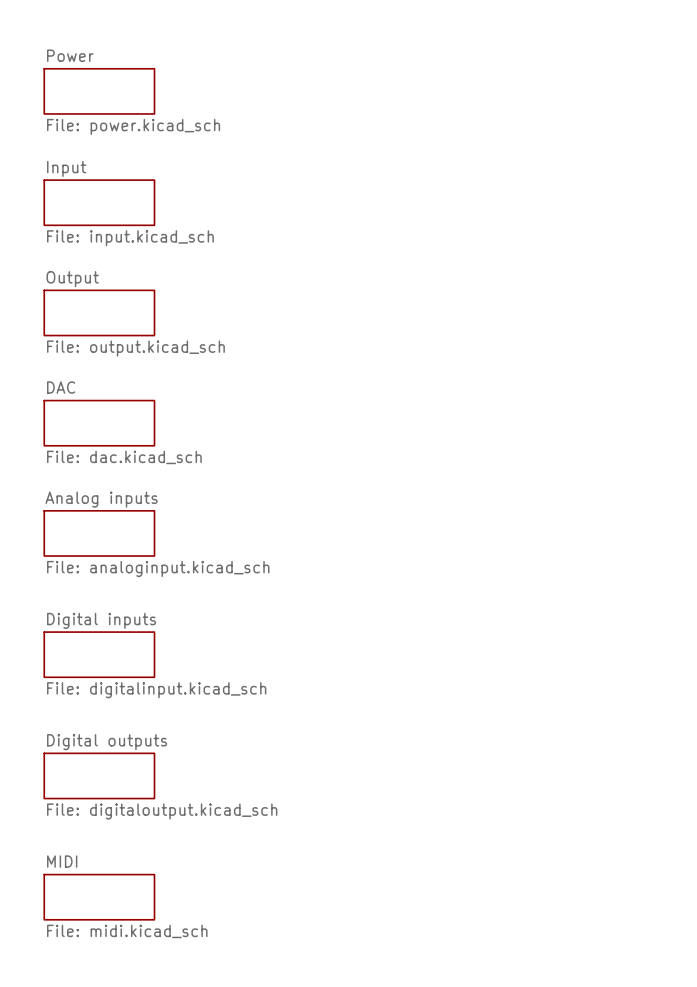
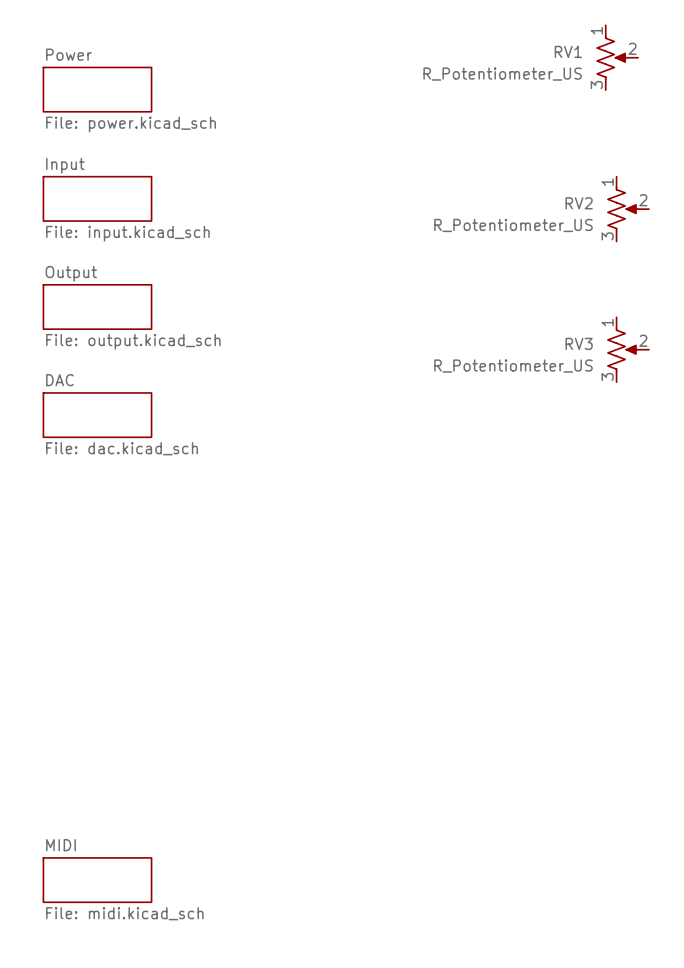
RV1: none -> R_Potentiometer_US (617, 57)
RV2: none -> R_Potentiometer_US (628, 209)
RV3: none -> R_Potentiometer_US (628, 349)
sheet Analog inputs: File: analoginput.kicad_sch (99, 533) -> none
sheet Digital inputs: File: digitalinput.kicad_sch (99, 654) -> none
sheet Digital outputs: File: digitaloutput.kicad_sch (99, 775) -> none

